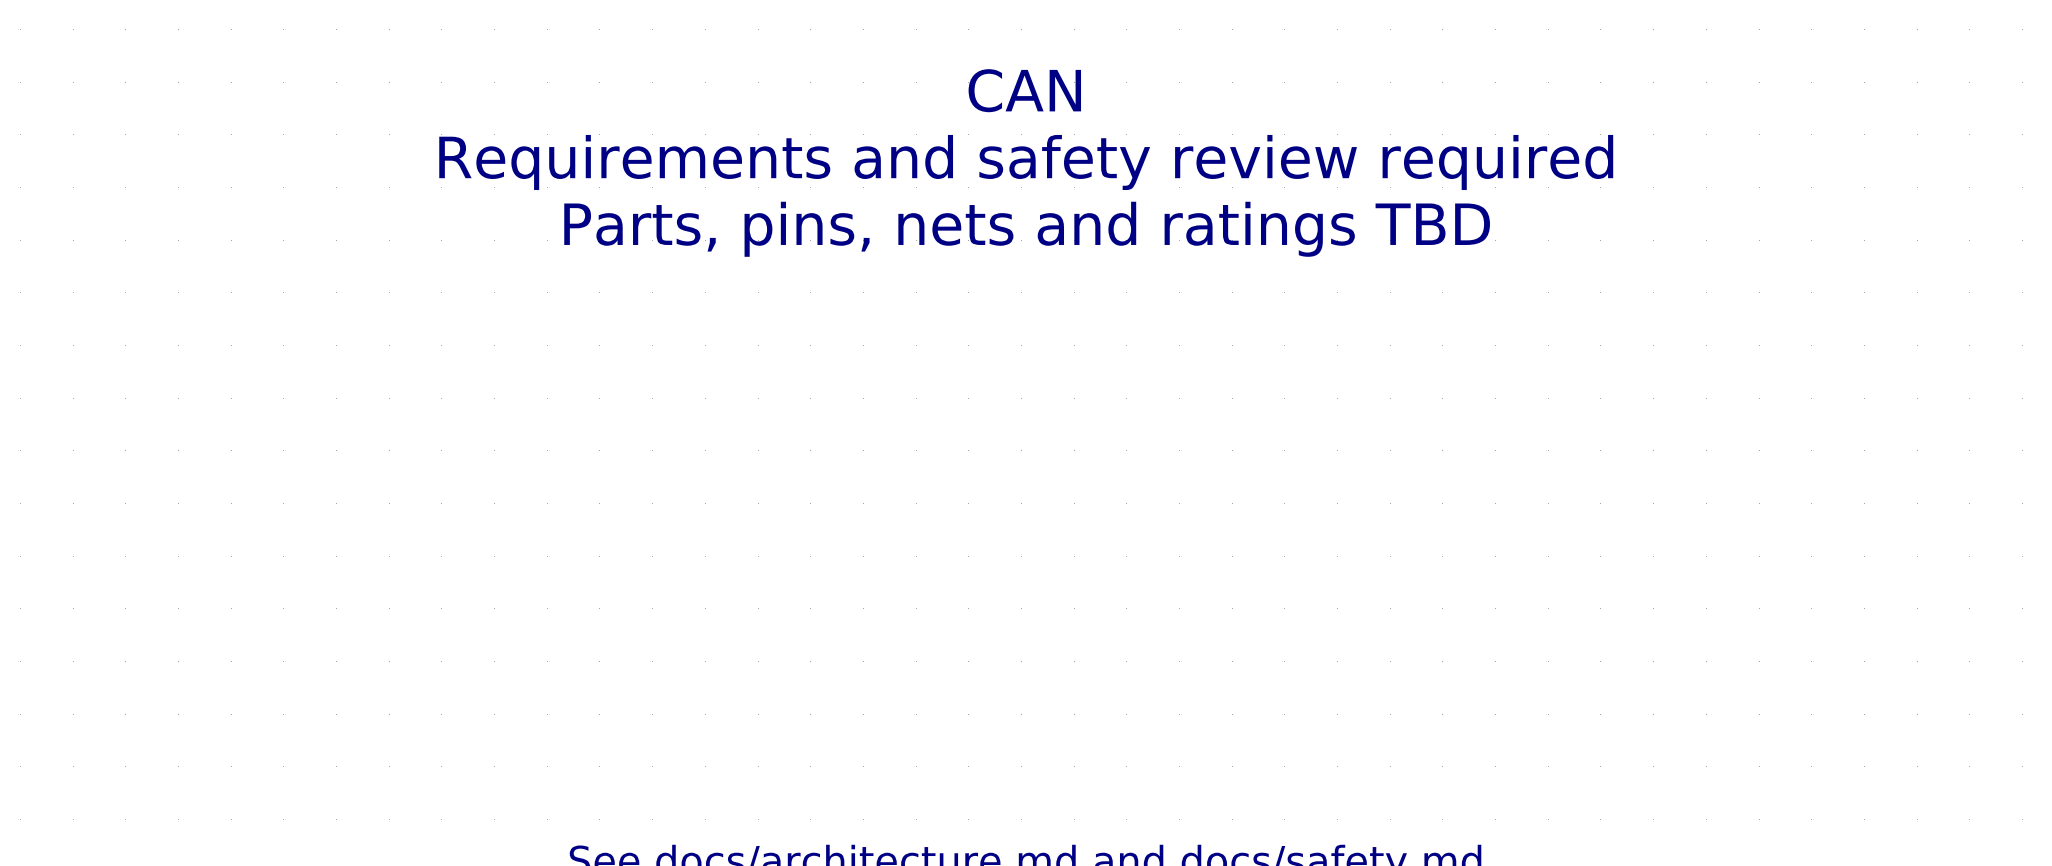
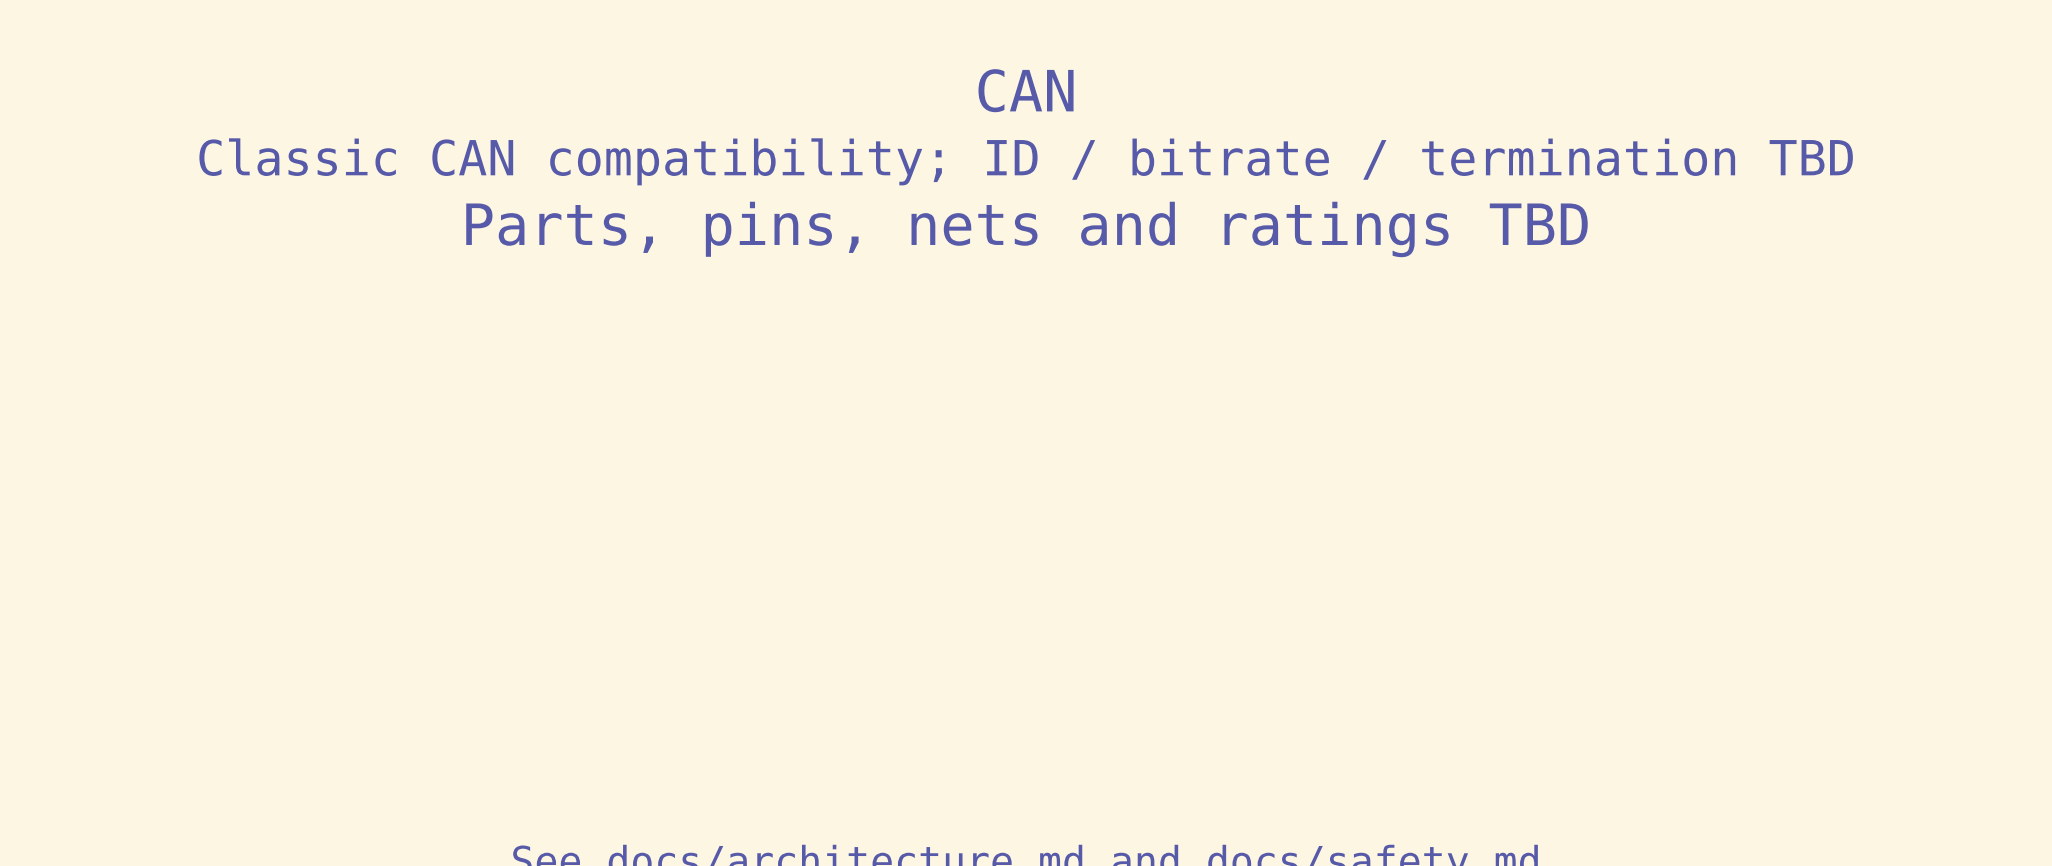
text: Requirements and safety review required (1026, 162) -> Classic CAN compatibility; ID / bitrate / termination TBD (1026, 161)

